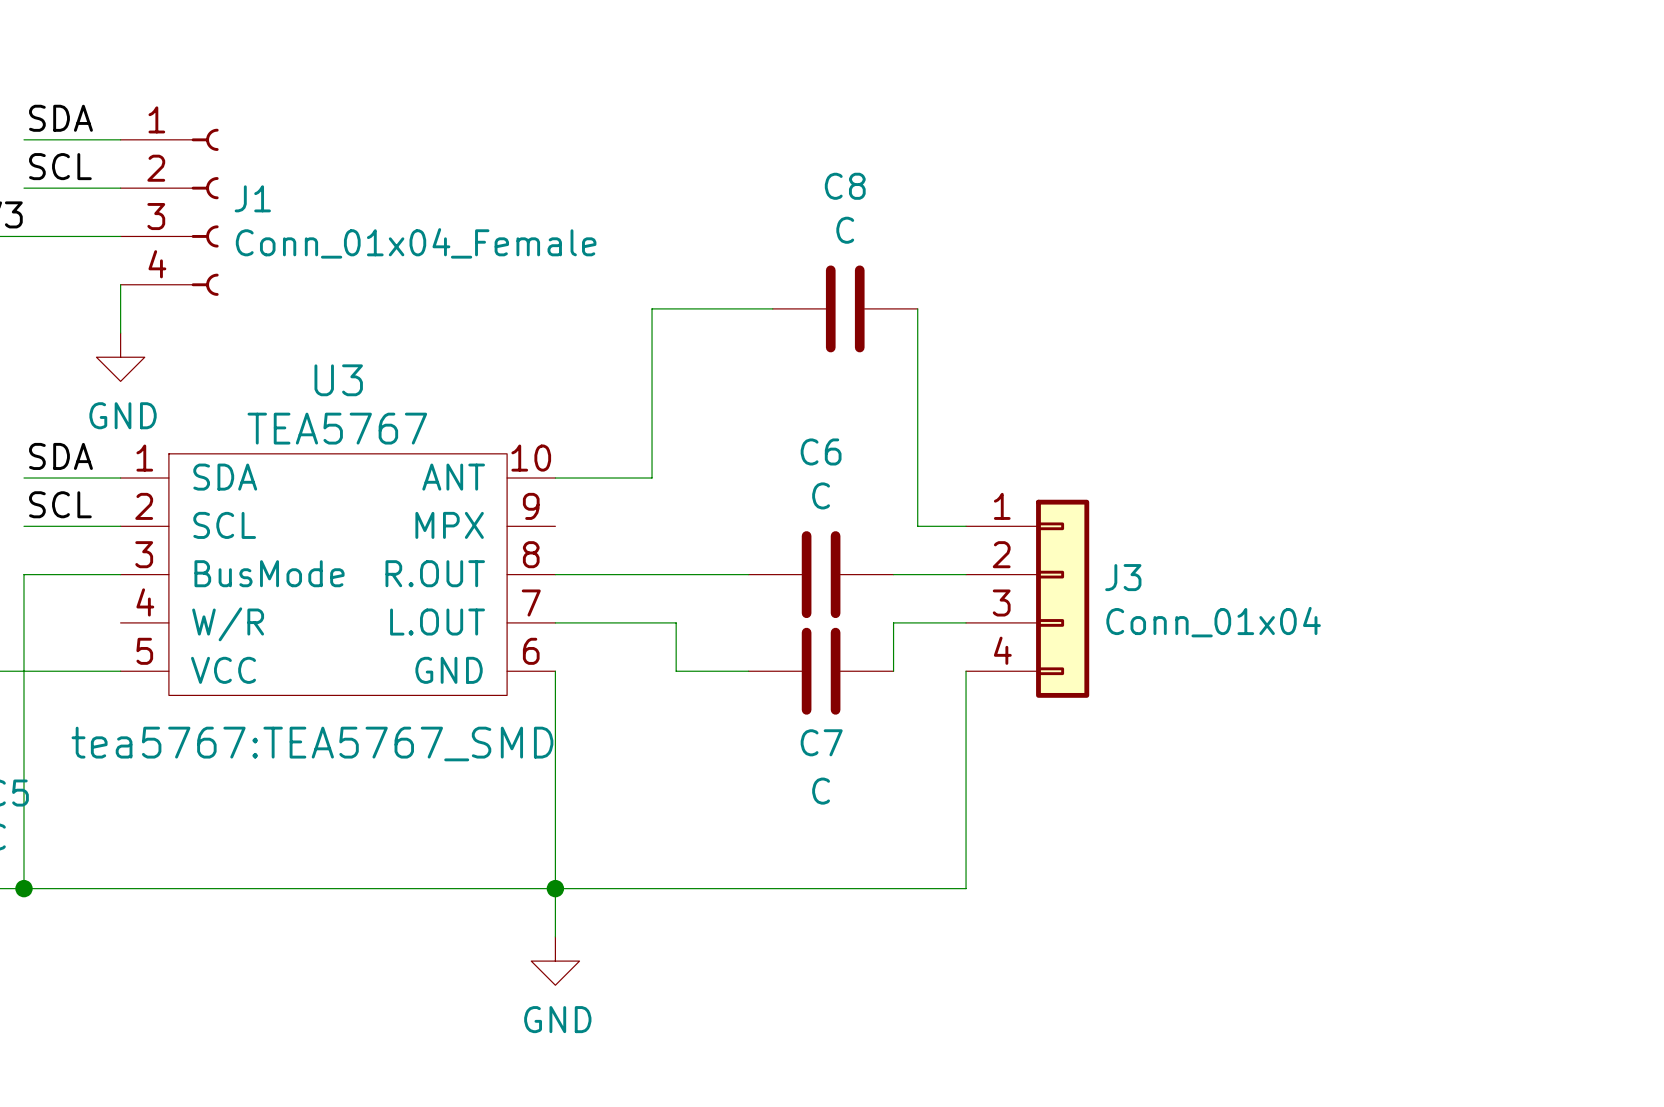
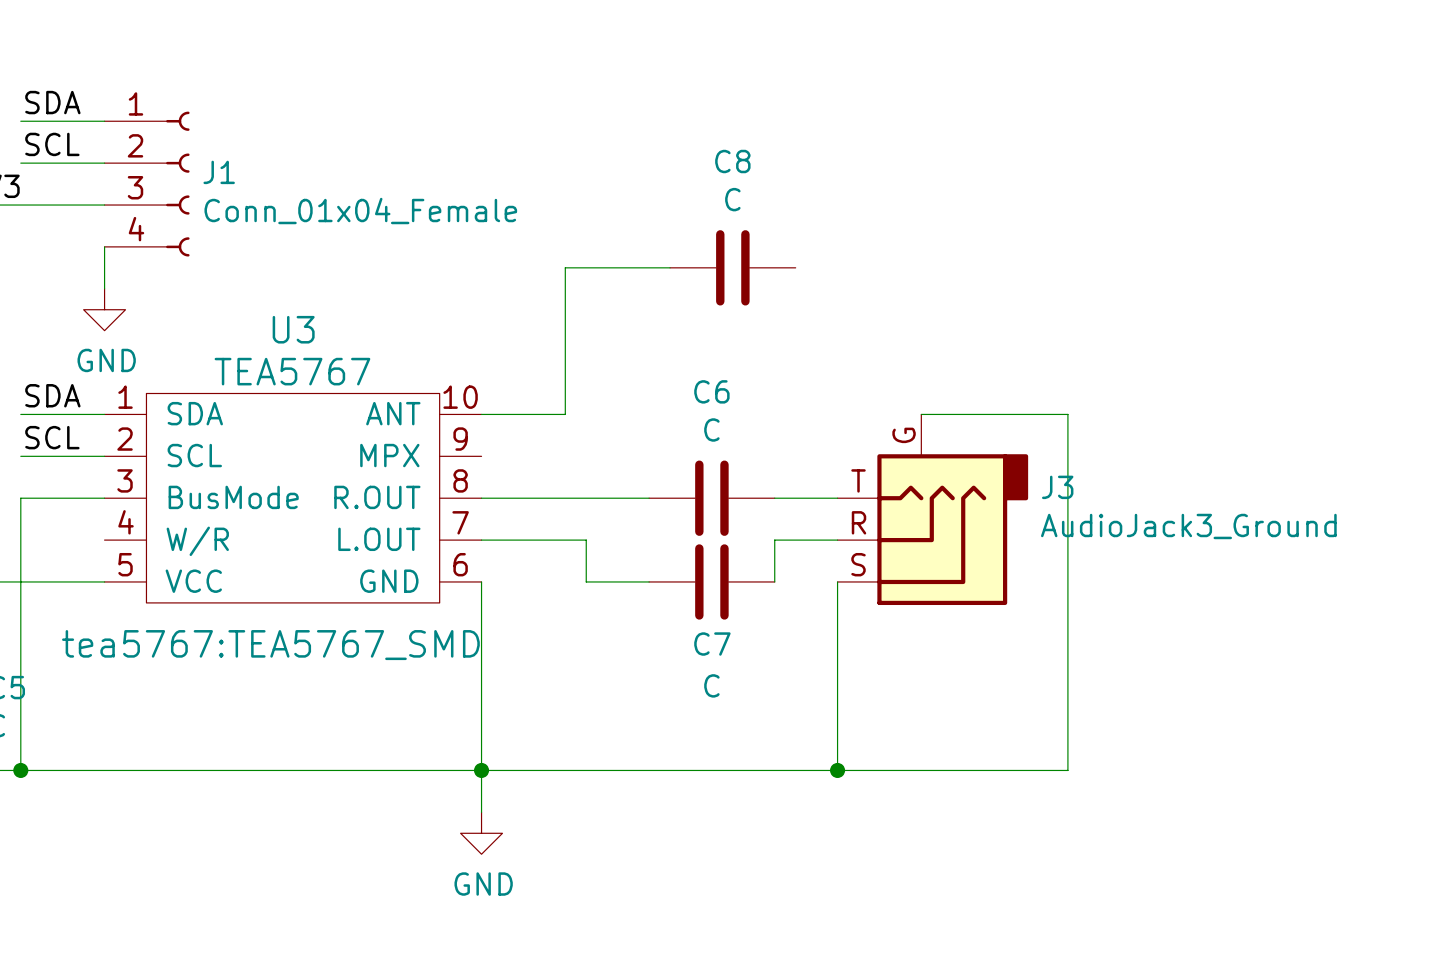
wire: (917, 308) (917, 526) (966, 526) -> none
wire: none -> (921, 414) (1067, 414) (1067, 770) (837, 770)
J3 symbol: [966, 499, 1090, 698] -> [837, 414, 1029, 606]
J3 name position: J3 (1123, 577) -> J3 (1057, 487)
J3 value: Conn_01x04 (1213, 622) -> AudioJack3_Ground (1188, 526)
junction: none -> (837, 770)

